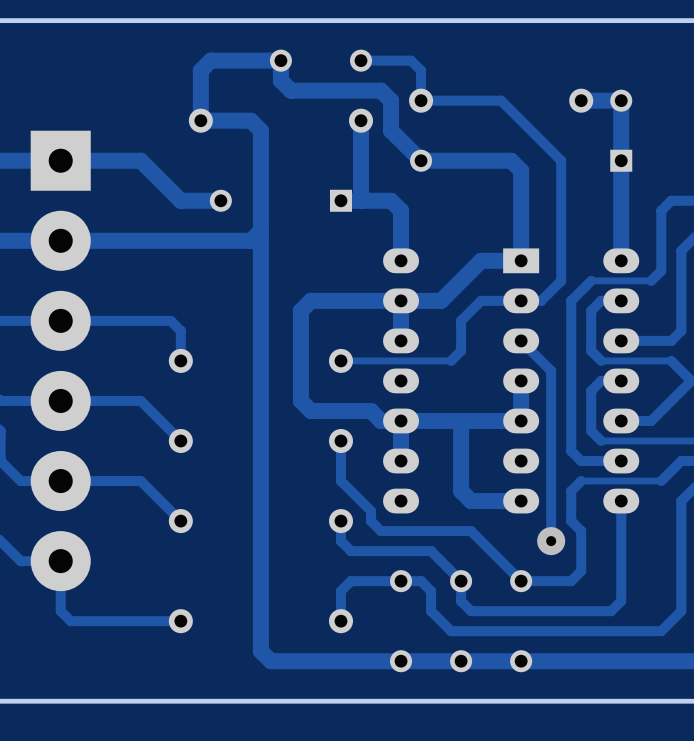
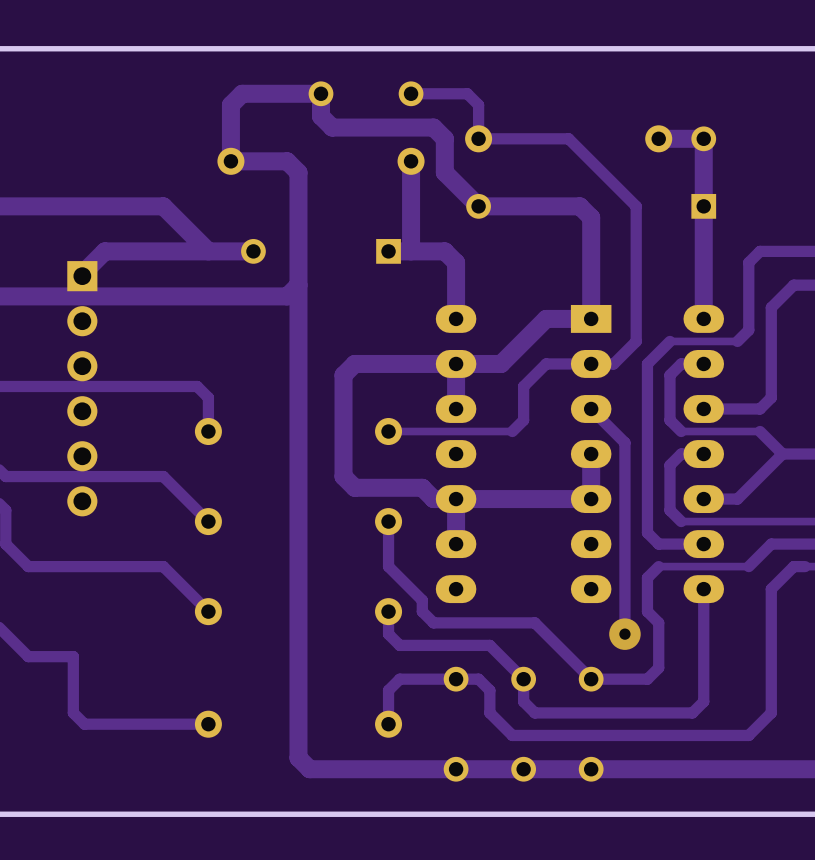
track: none -> (208, 251) (104, 251) (82, 273)
part: none -> (82, 388)
part: (60, 360) -> none
track: (461, 420) (461, 491) (471, 501) (521, 501) -> none

